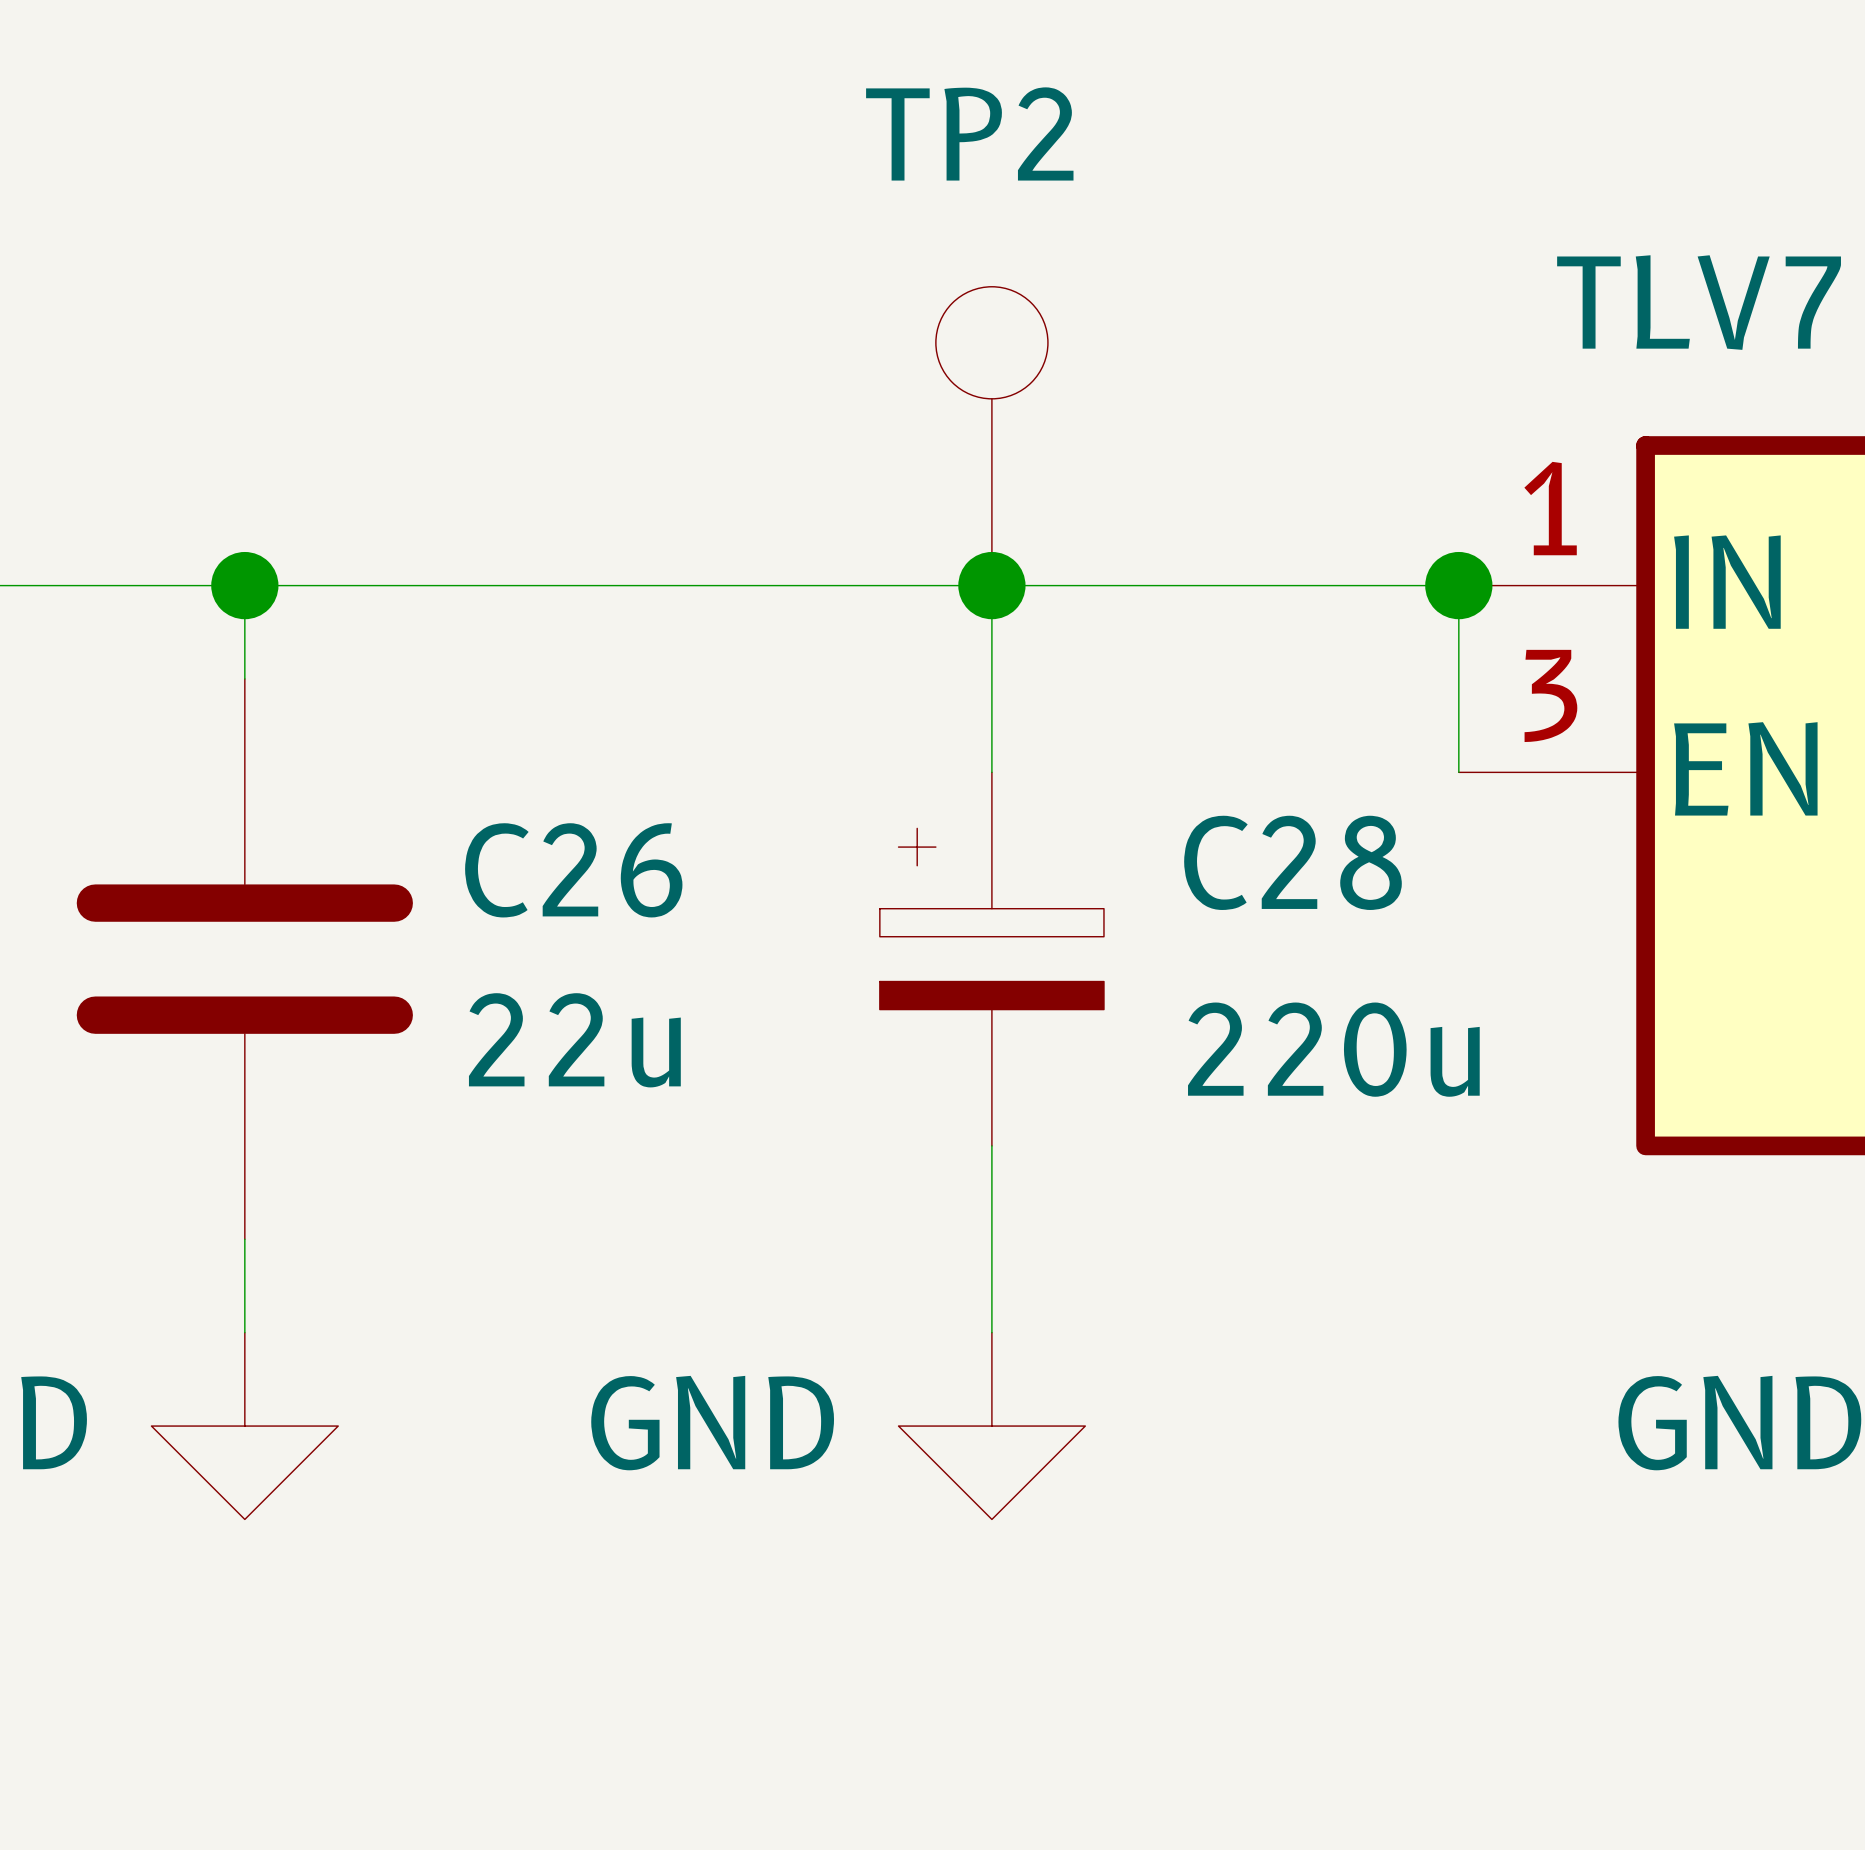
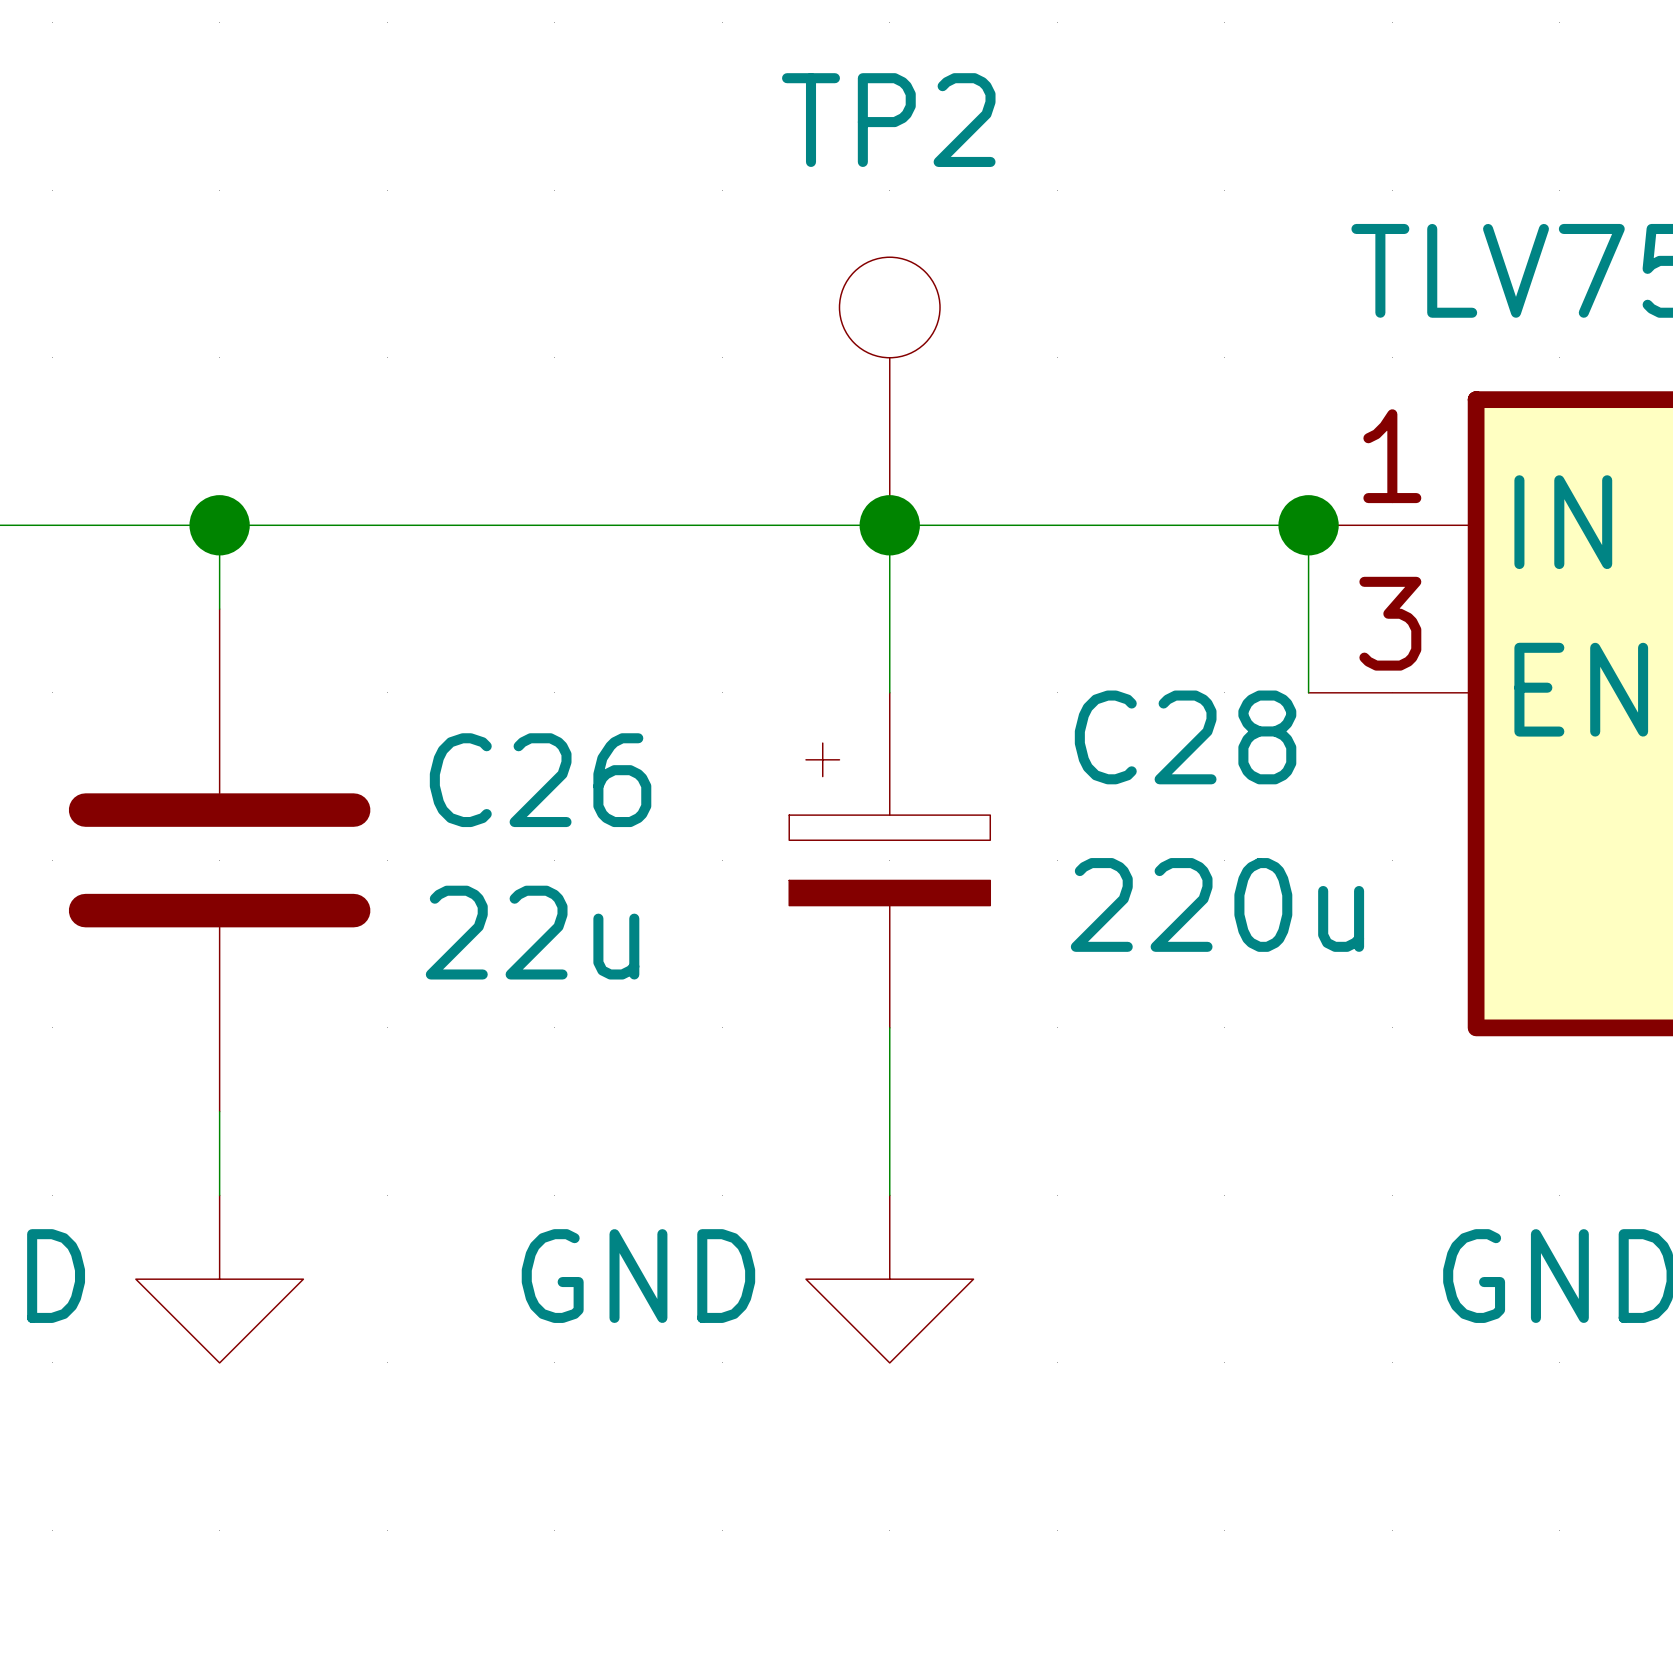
C28 name position: C28 (1292, 862) -> C28 (1185, 737)
C28 value position: 220u (1333, 1049) -> 220u (1217, 904)

